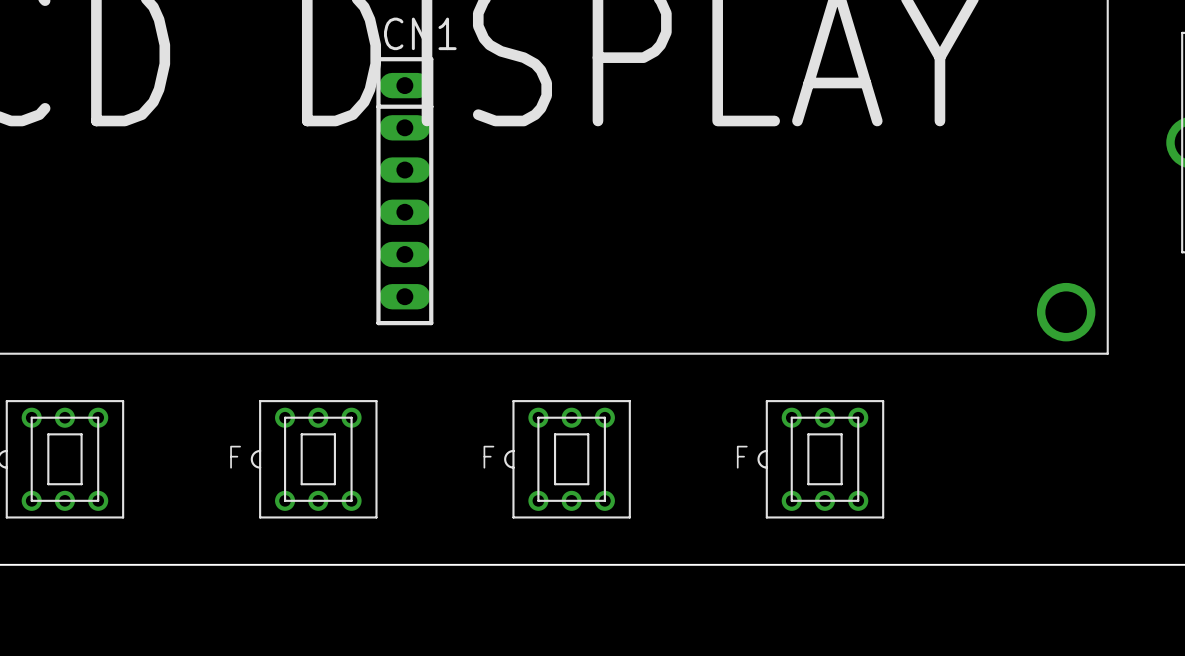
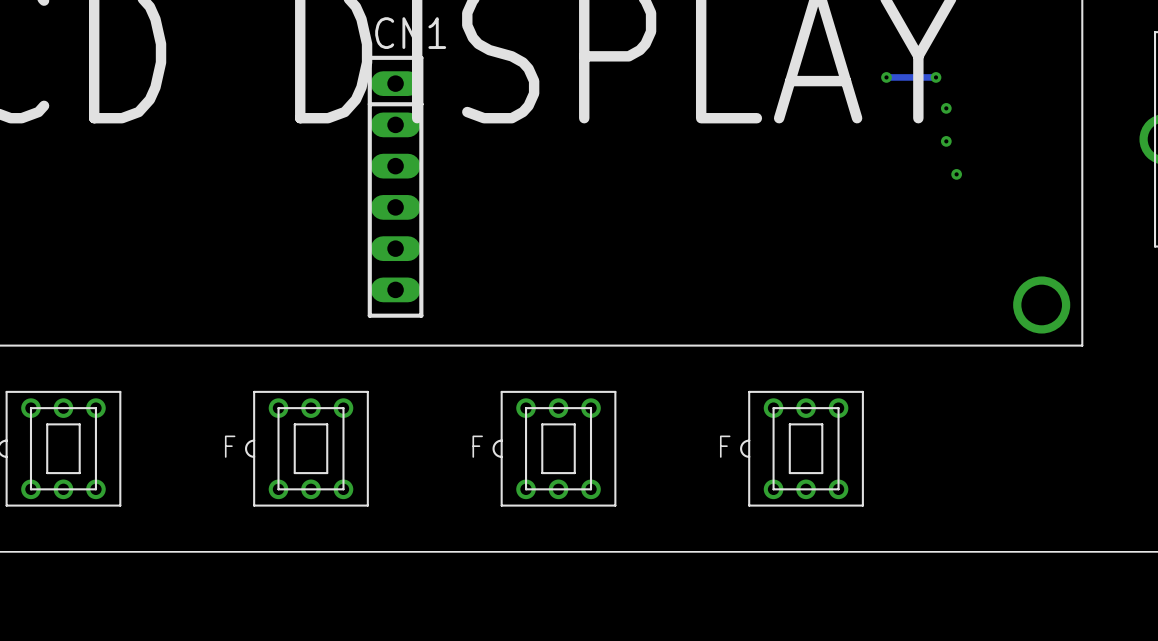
via: none -> (886, 77)
track: none -> (936, 77) (886, 77)
via: none -> (936, 77)
via: none -> (946, 108)
via: none -> (946, 141)
via: none -> (956, 174)

